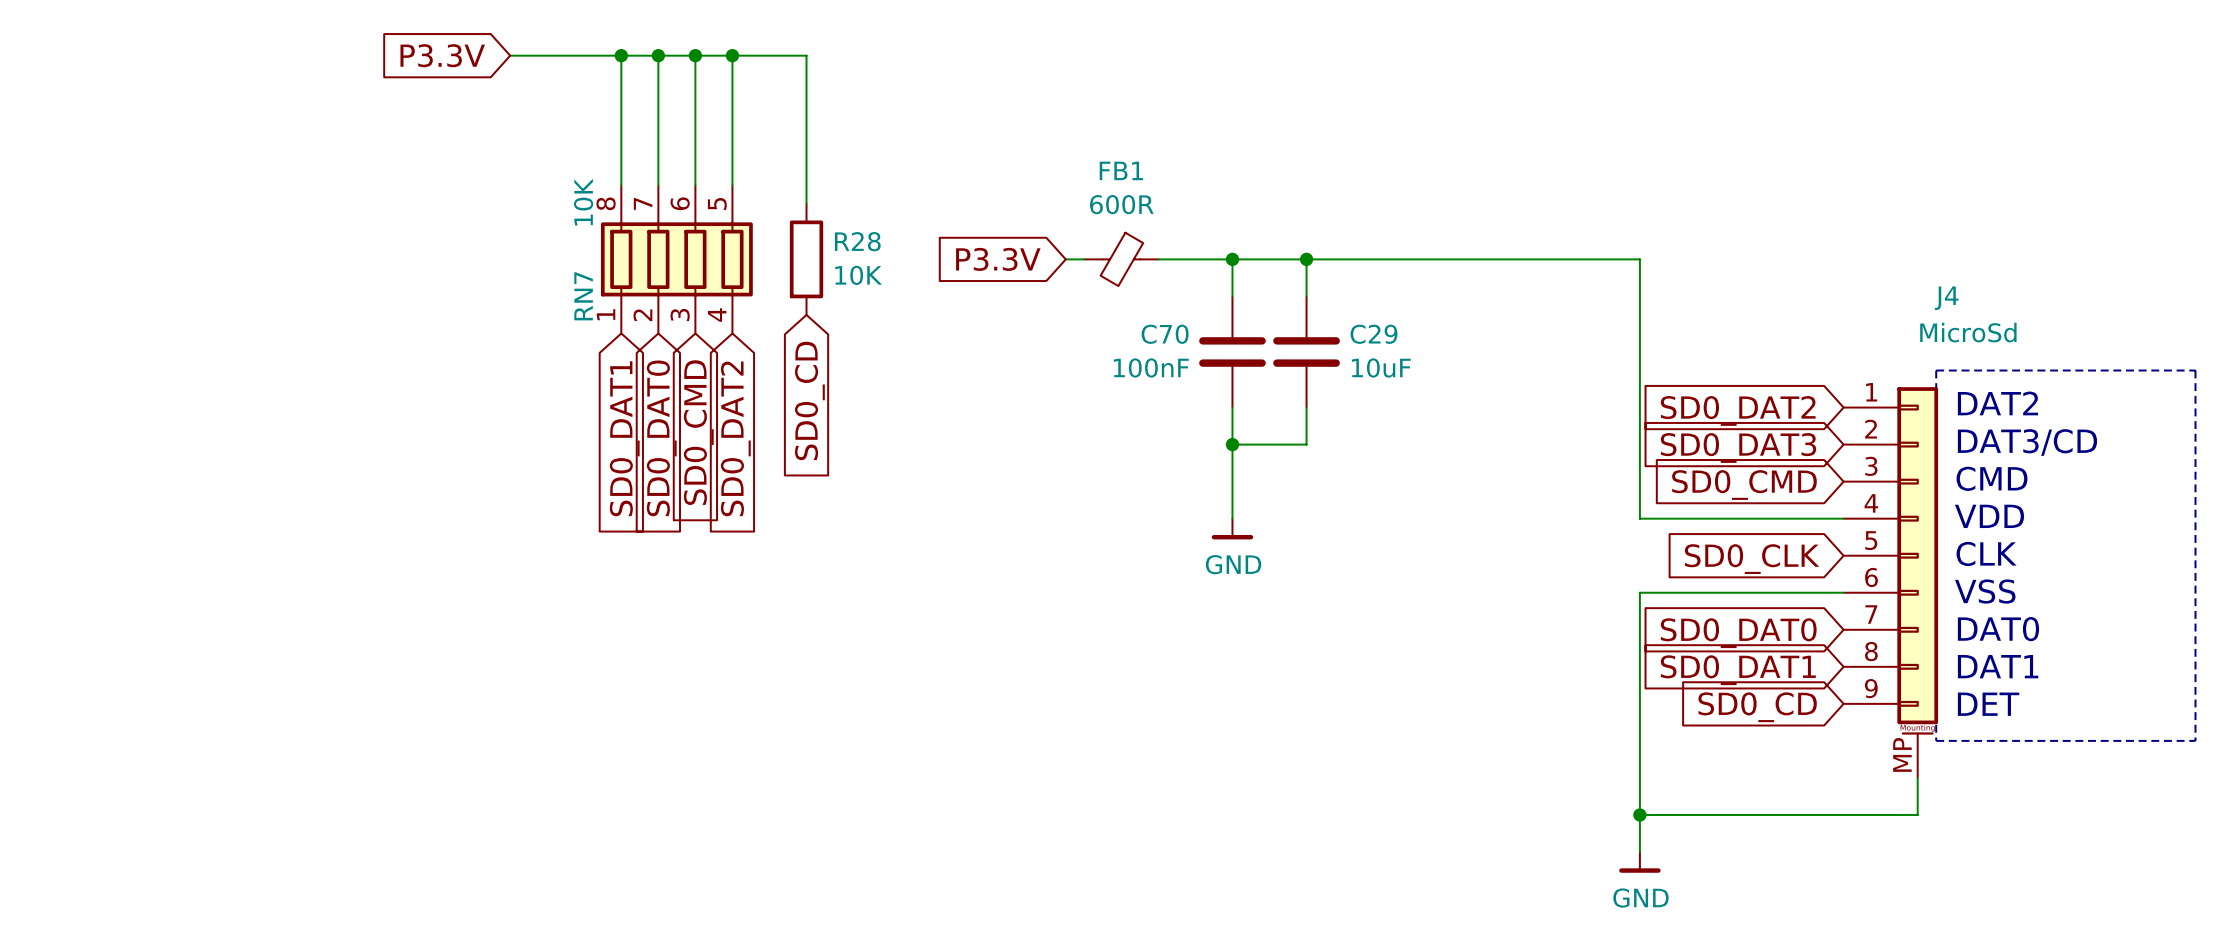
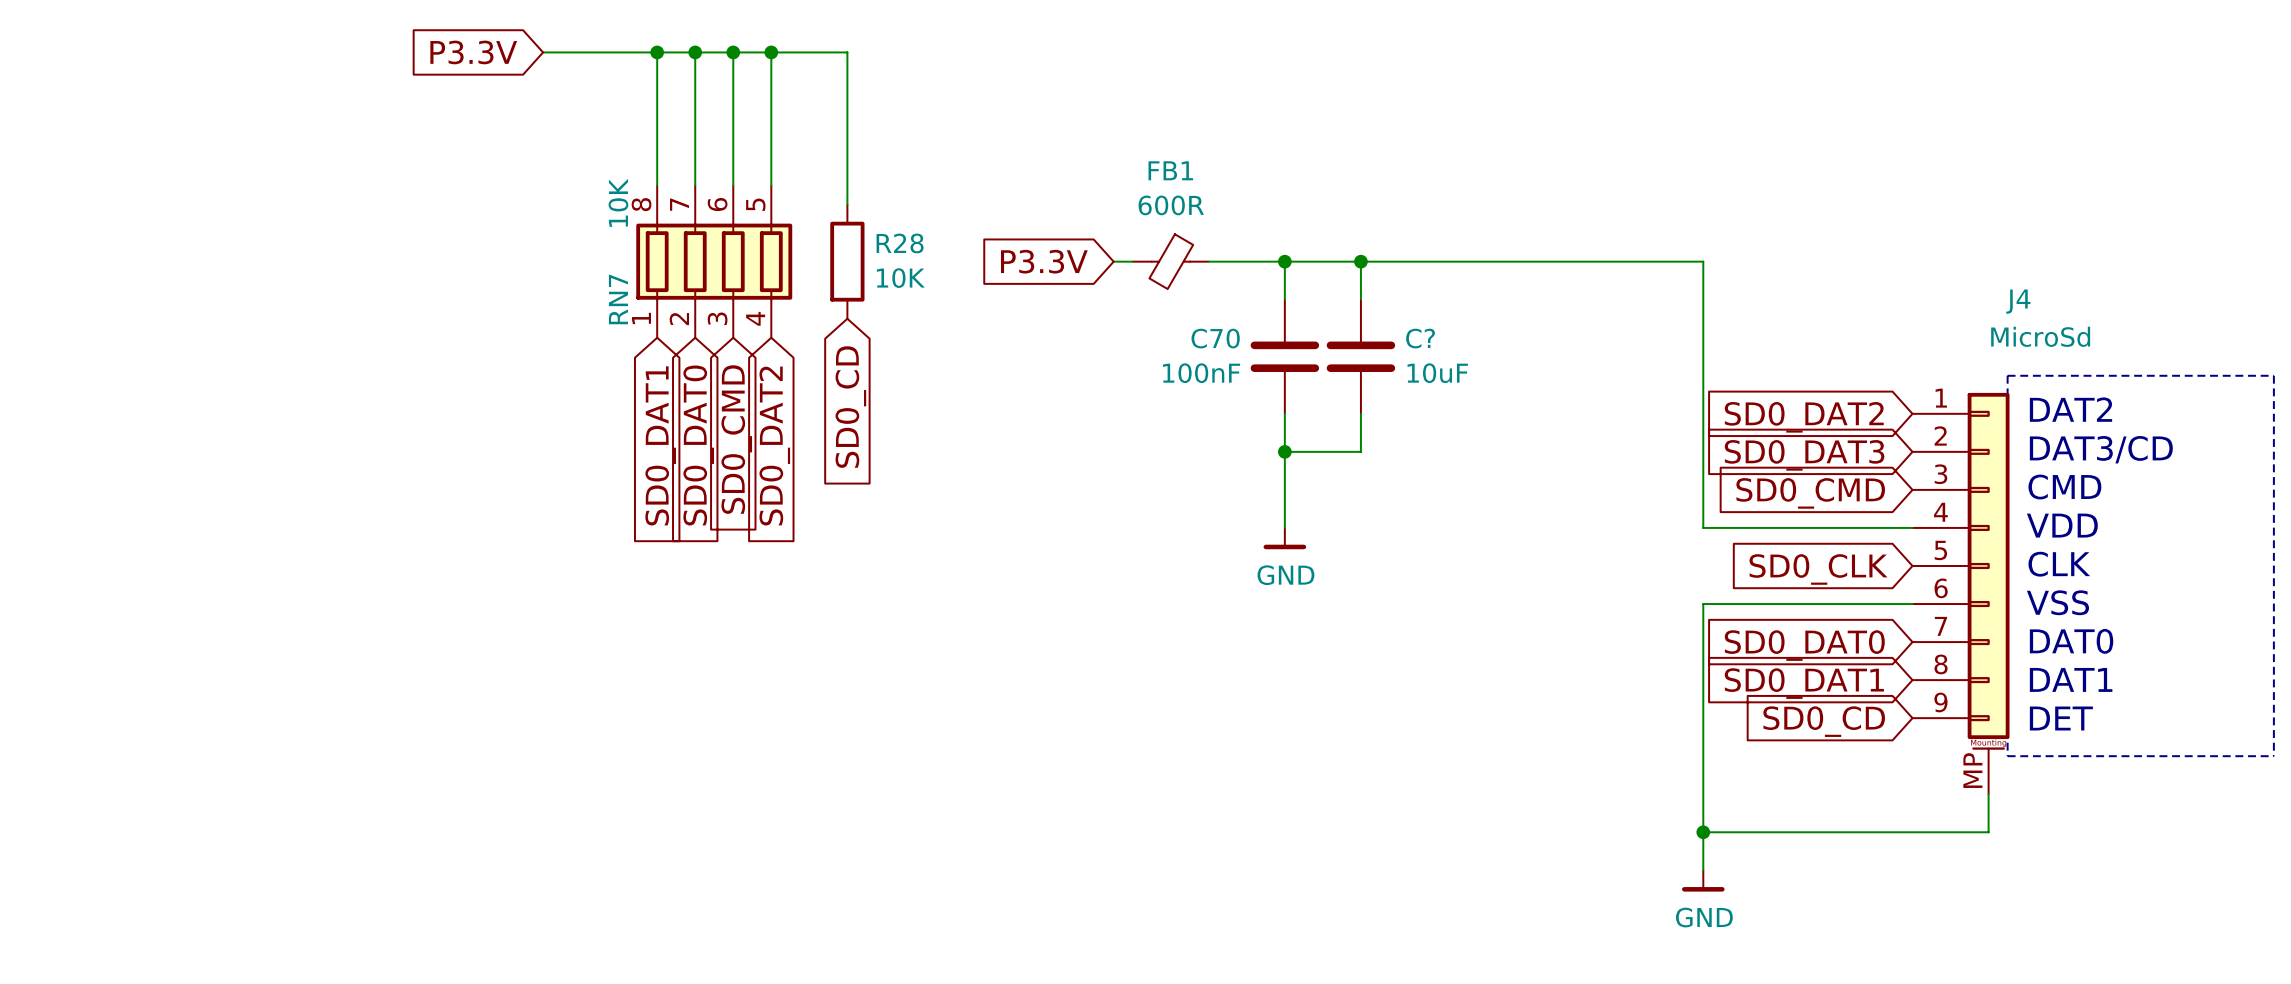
C29 name: C29 (1373, 334) -> C? (1420, 338)

